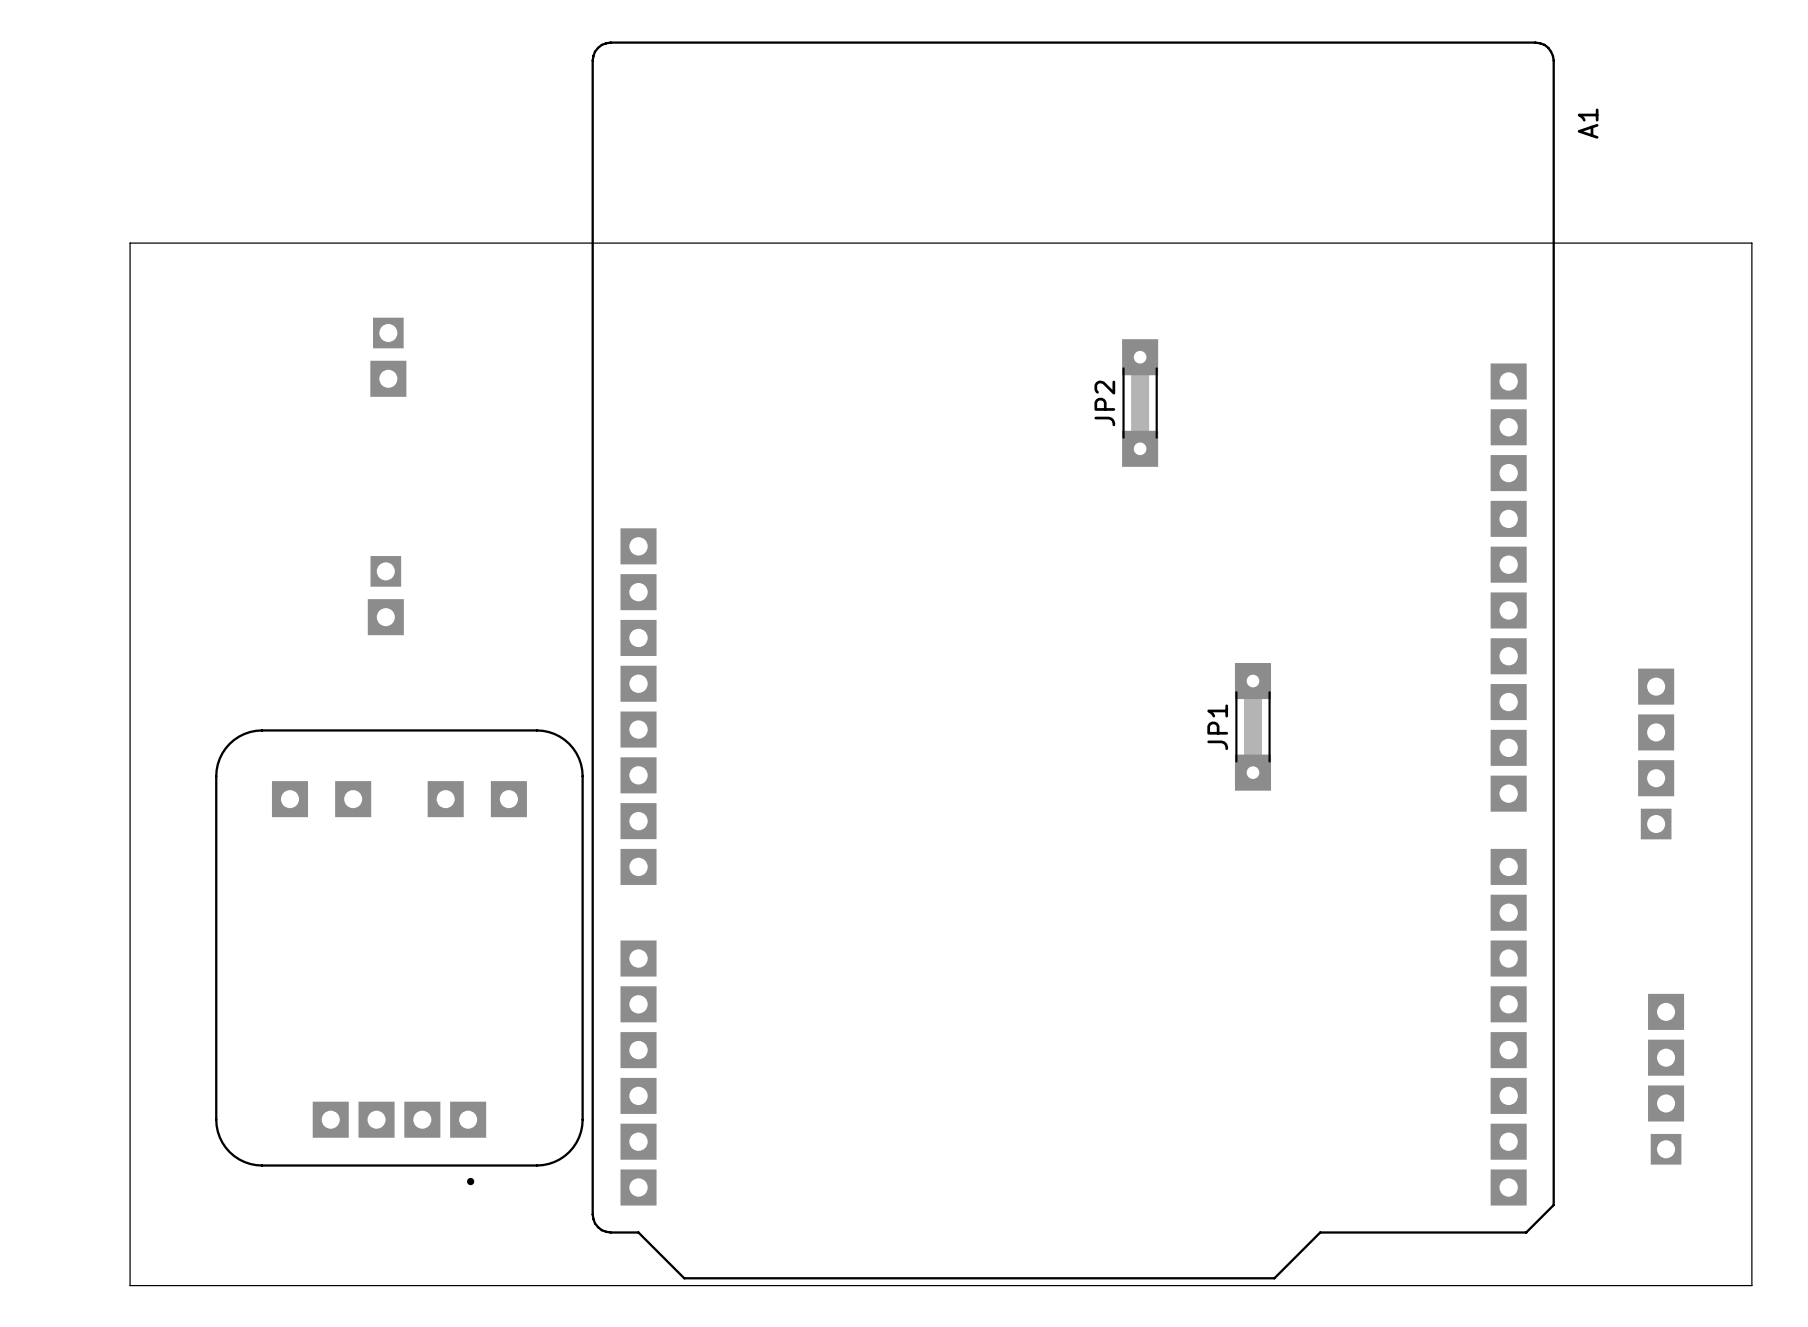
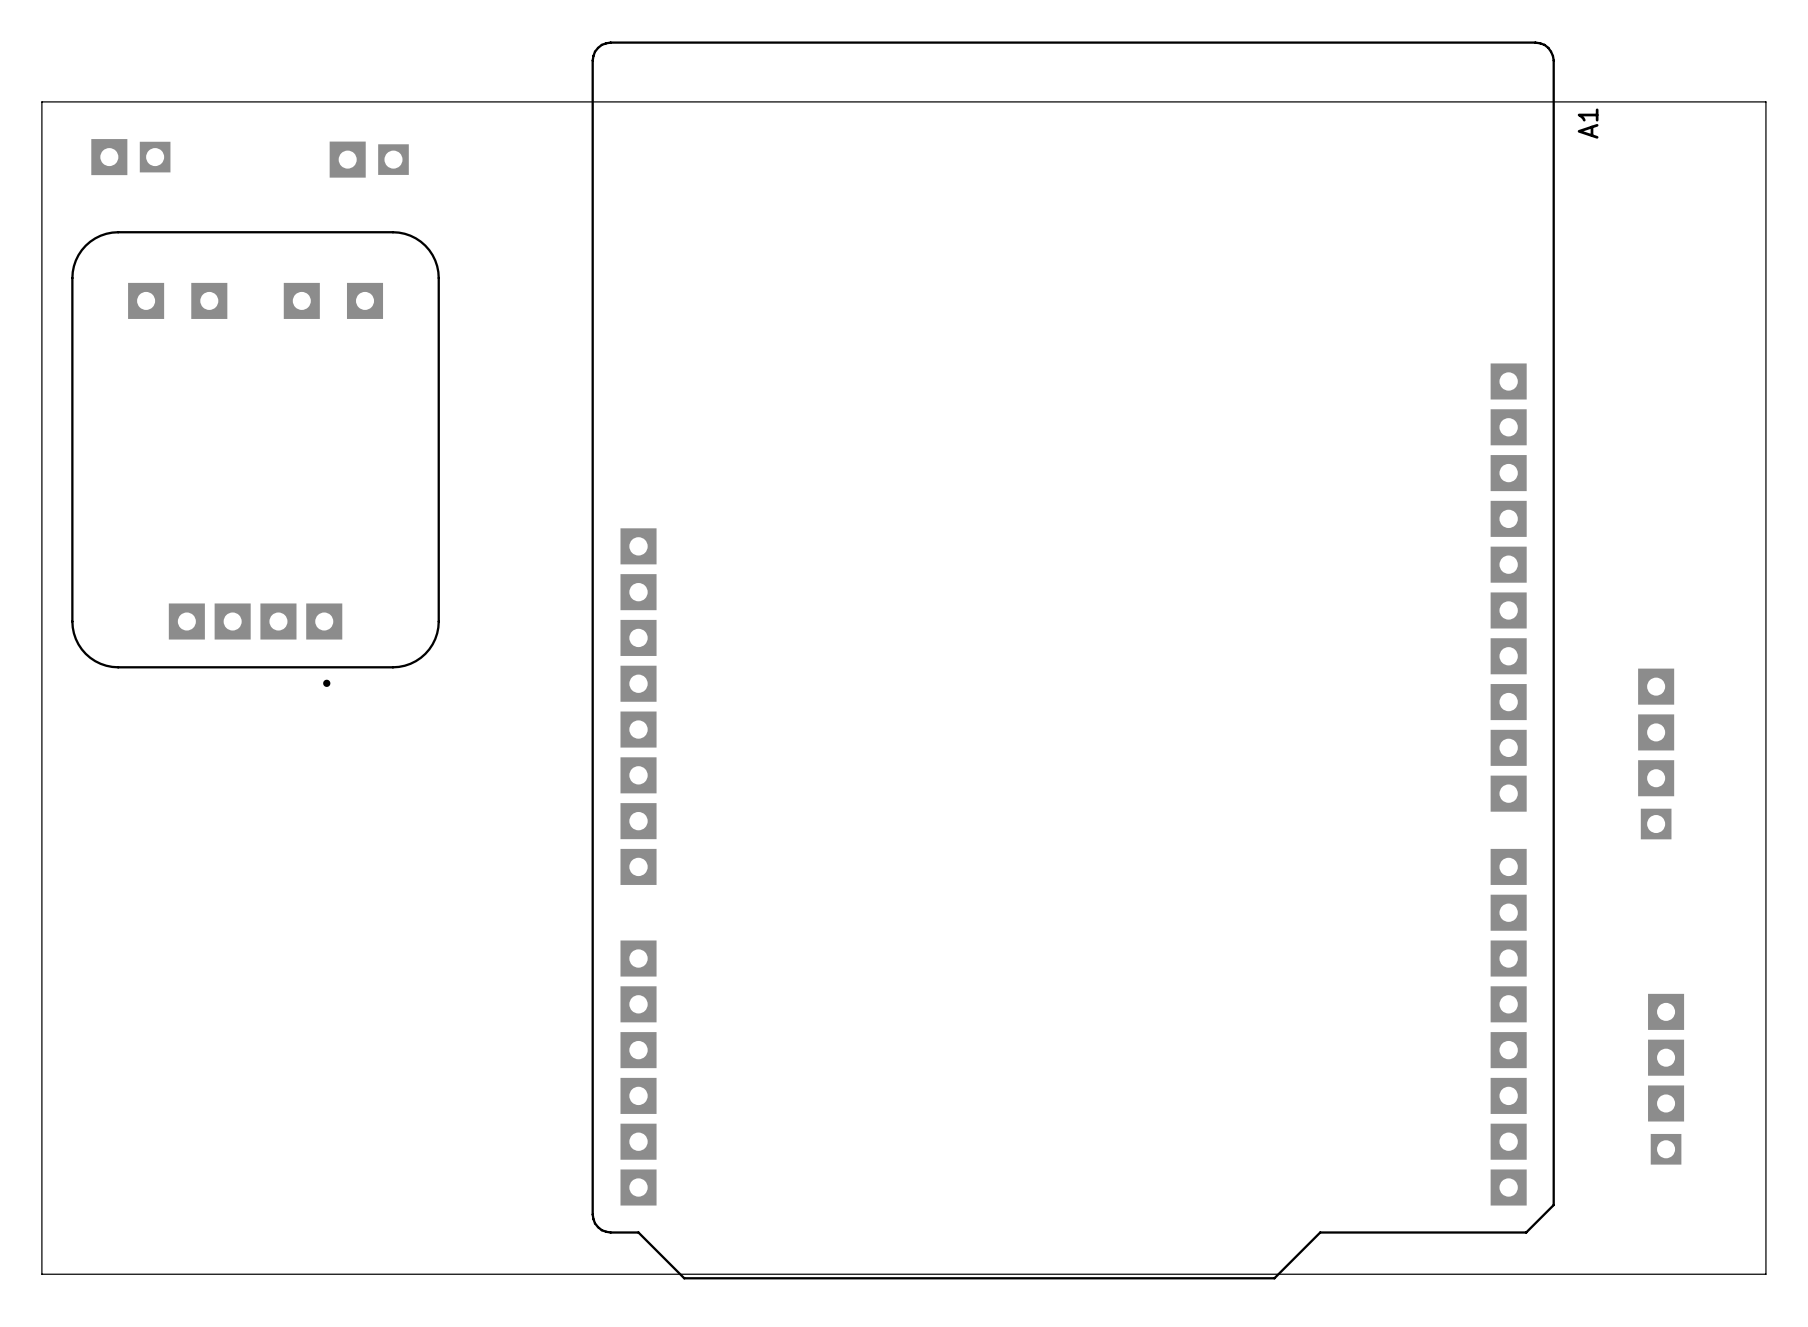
part: none -> (130, 157)
part: none -> (369, 159)
board edge: (130, 243) (1751, 243) (1751, 1285) (130, 1285) (130, 243) -> (41, 101) (41, 1274) (1765, 1274) (1765, 101) (41, 101)
part: (388, 357) -> none
track: (1140, 357) (1140, 448) -> none
JP2: (1140, 403) -> none
part: none -> (255, 459)
part: (385, 595) -> none
track: (1252, 681) (1252, 772) -> none
JP1: (1252, 726) -> none
part: (399, 957) -> none

